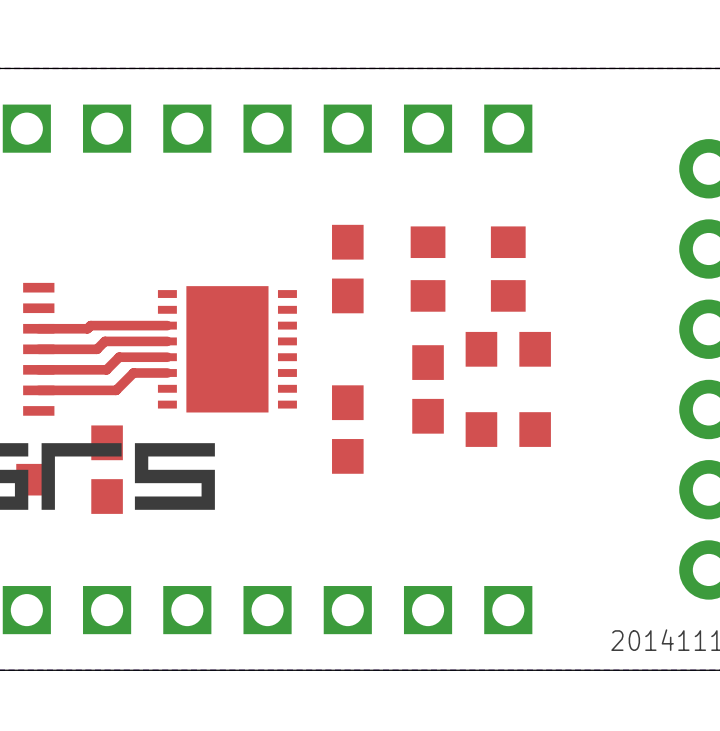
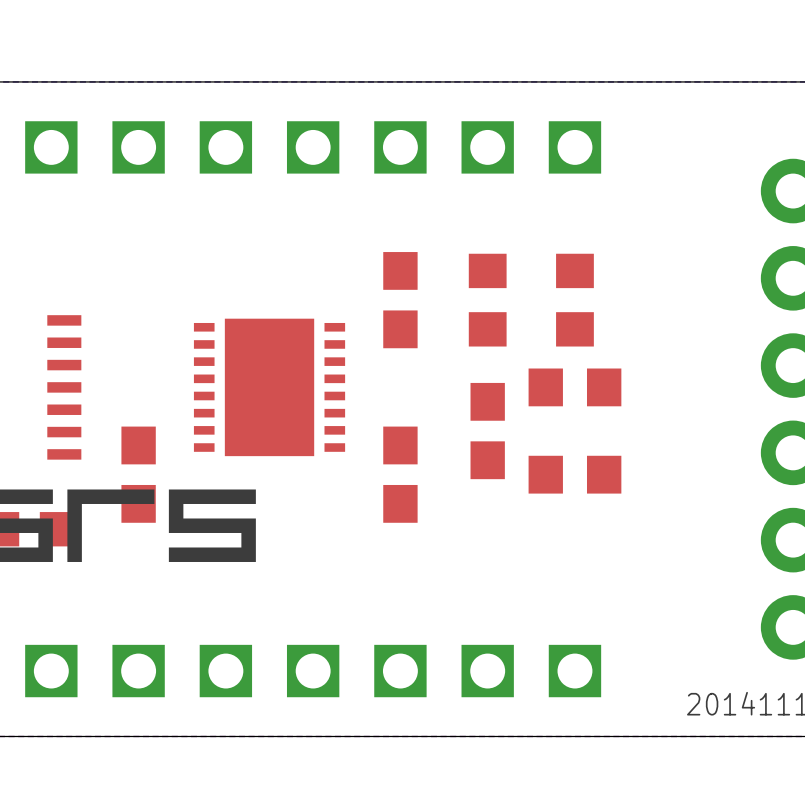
top track: (167, 325) (90, 325) (87, 328) (38, 328) -> none
top track: (167, 341) (104, 341) (97, 349) (38, 349) -> none
top track: (167, 357) (119, 357) (106, 369) (38, 369) -> none
top track: (167, 373) (133, 373) (116, 390) (38, 390) -> none
part position: (107, 469) -> (138, 474)

